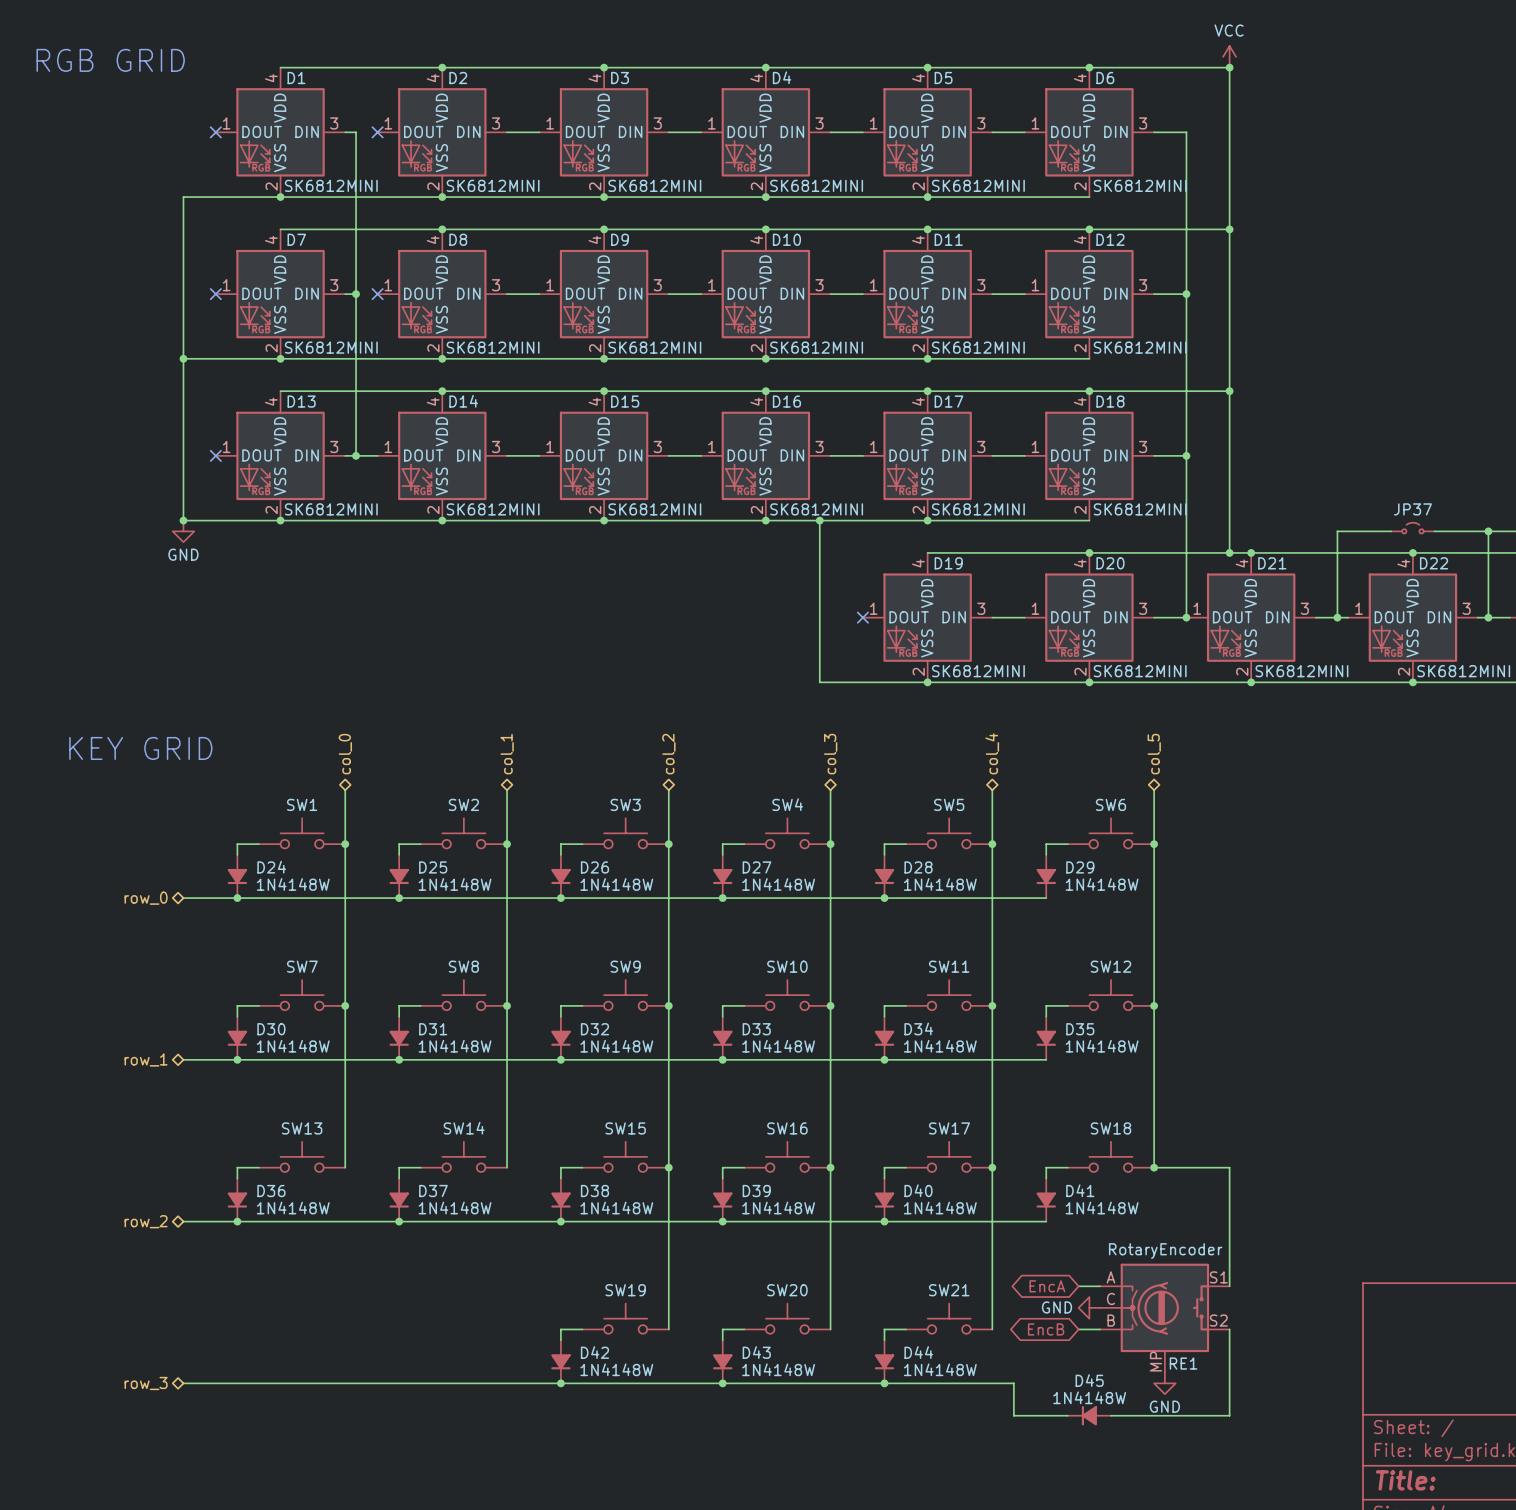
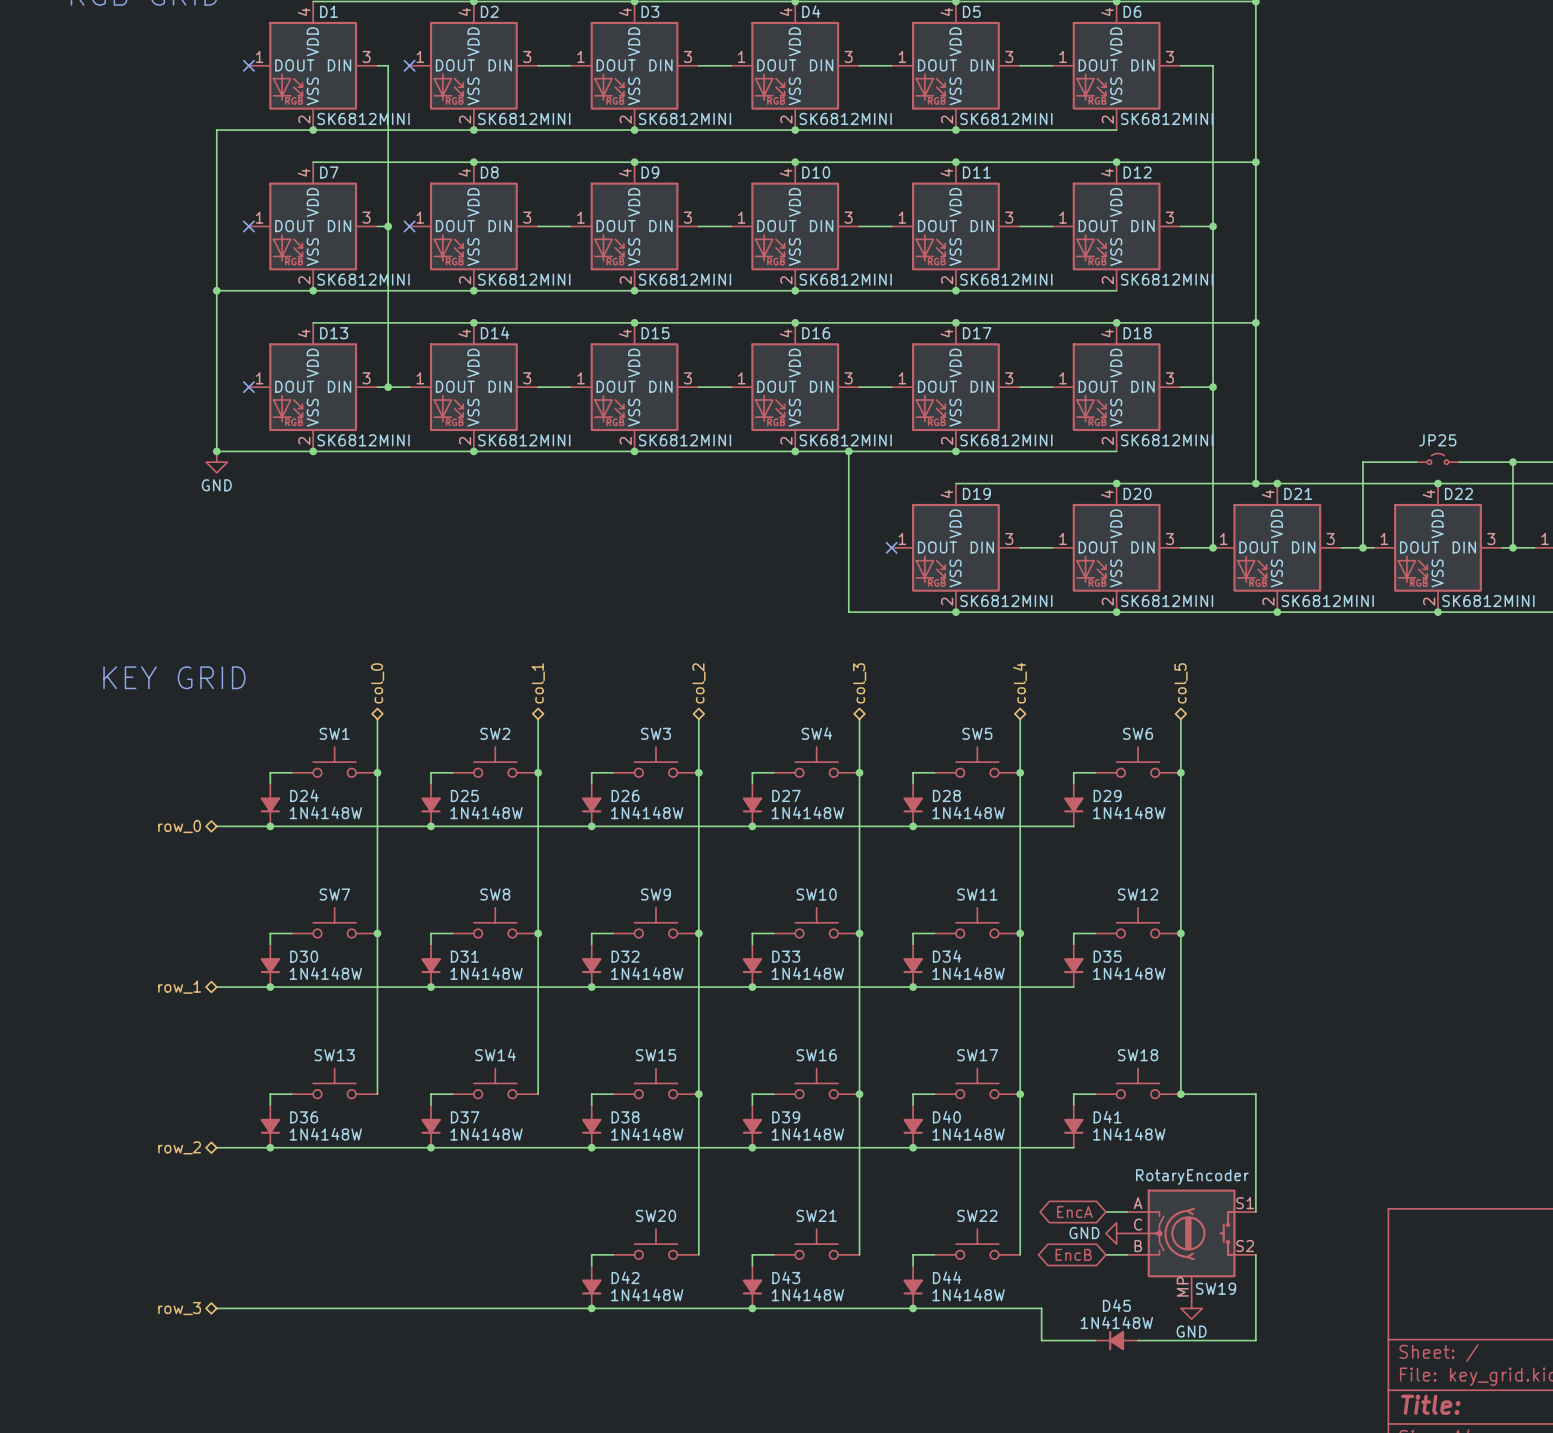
JP37 name: JP37 (1412, 509) -> JP25 (1437, 440)
SW19 name: SW19 (625, 1290) -> SW20 (655, 1215)
SW20 name: SW20 (787, 1290) -> SW21 (816, 1215)
SW21 name: SW21 (949, 1290) -> SW22 (977, 1215)
RE1 name: RE1 (1183, 1363) -> SW19 (1216, 1288)

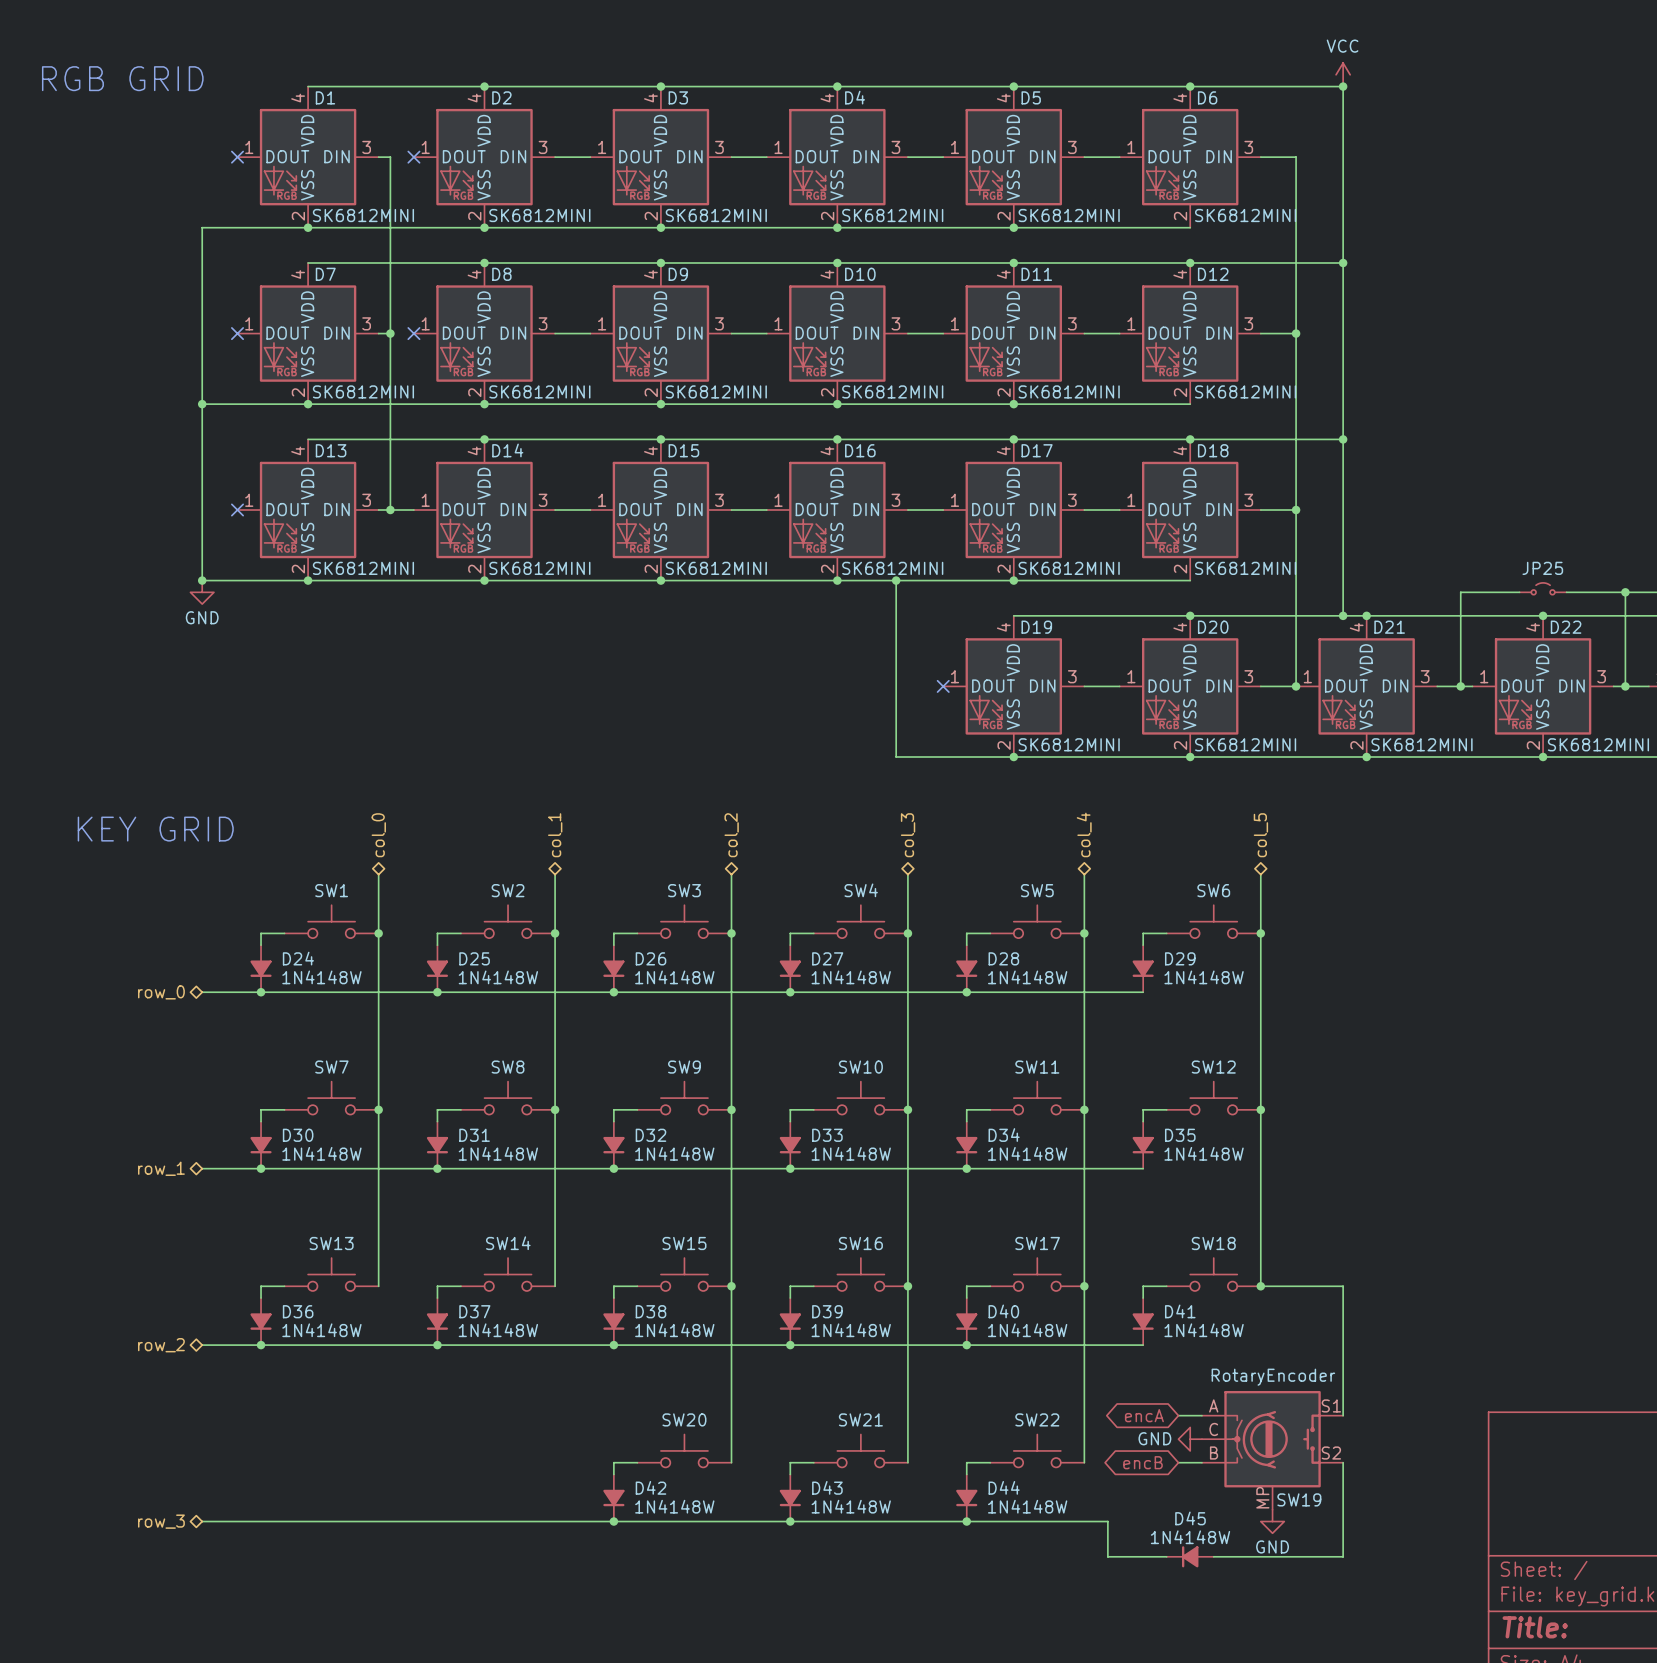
global label: EncA (1074, 1212) -> encA (1144, 1415)
global label: EncB (1073, 1254) -> encB (1143, 1462)

